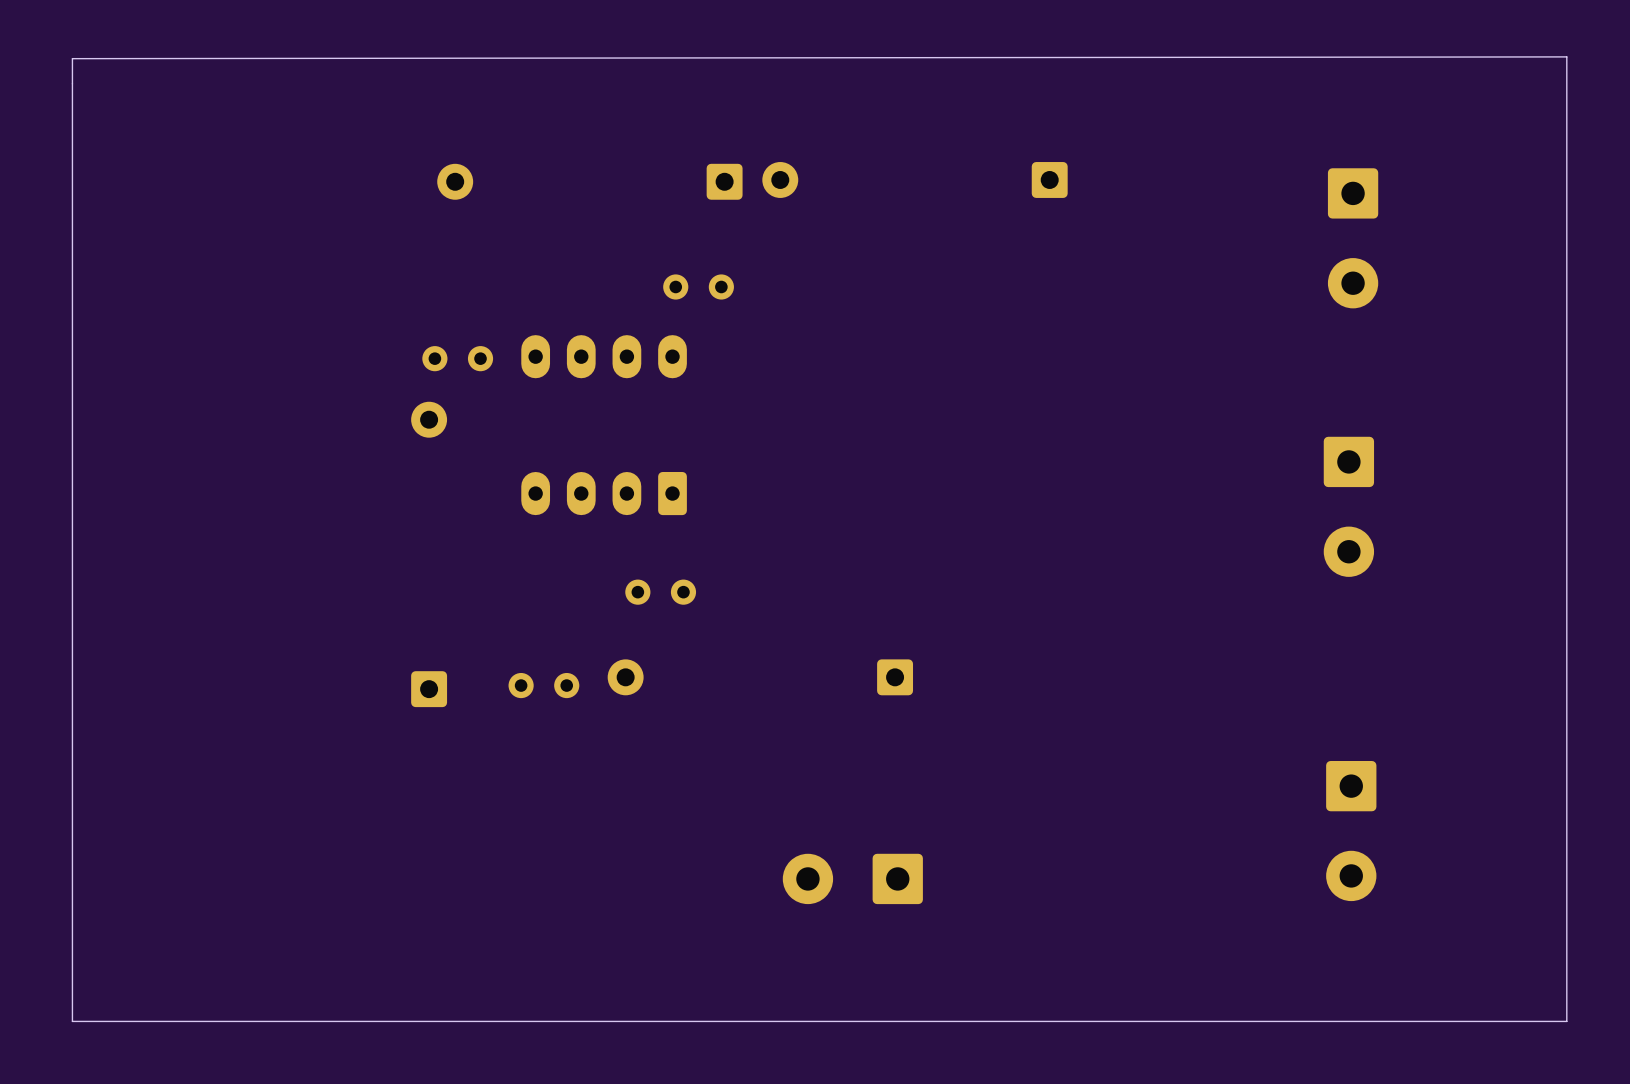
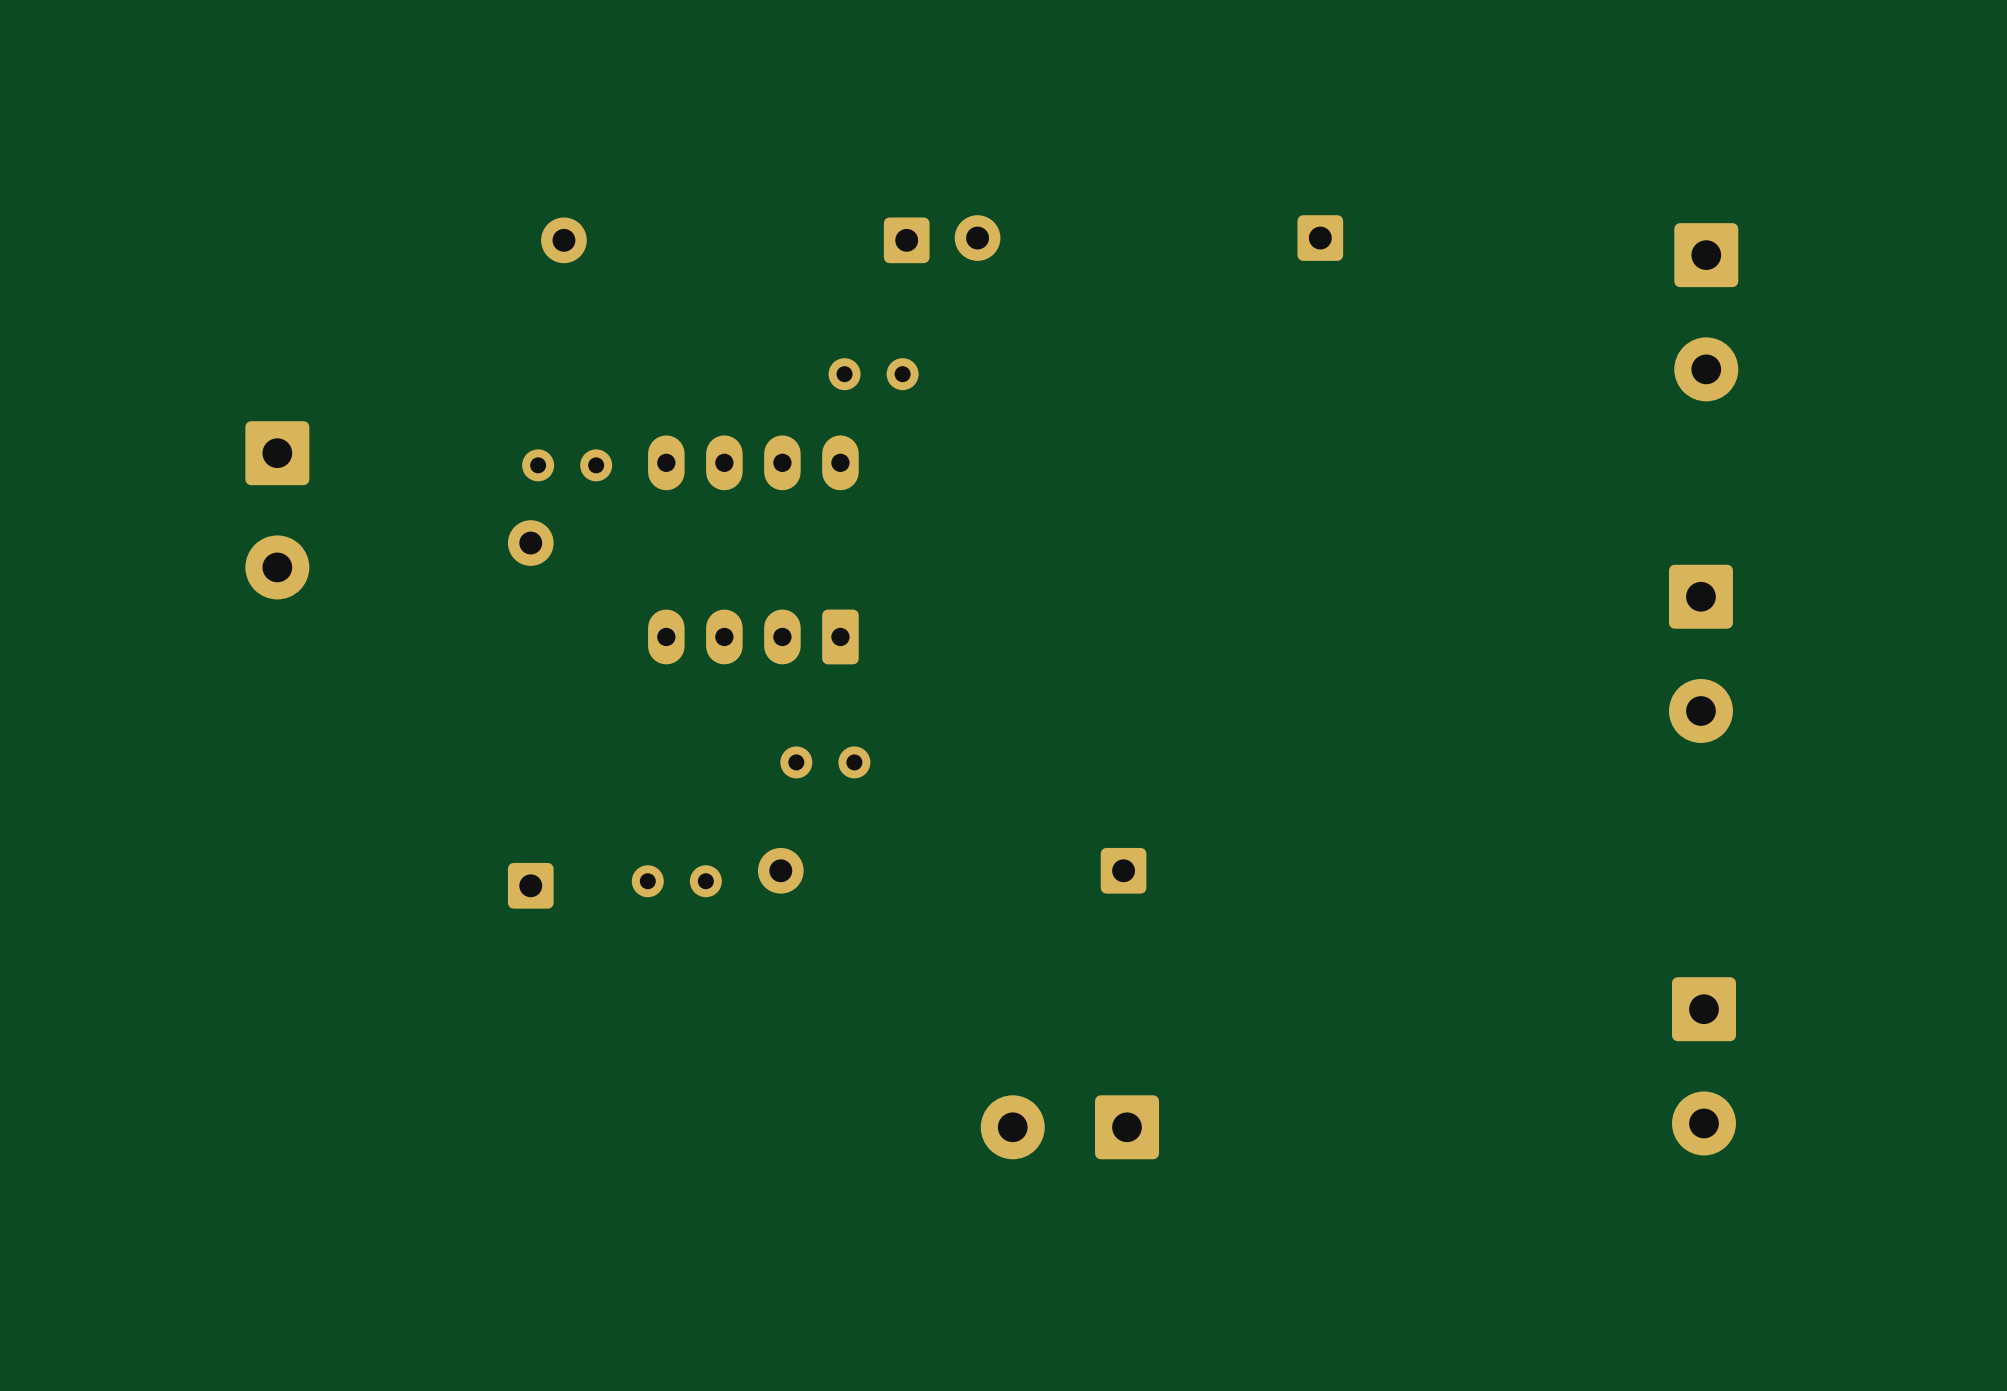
board edge: (1566, 56) (72, 58) (72, 1021) (1566, 1021) (1566, 56) -> none
part: none -> (277, 510)

